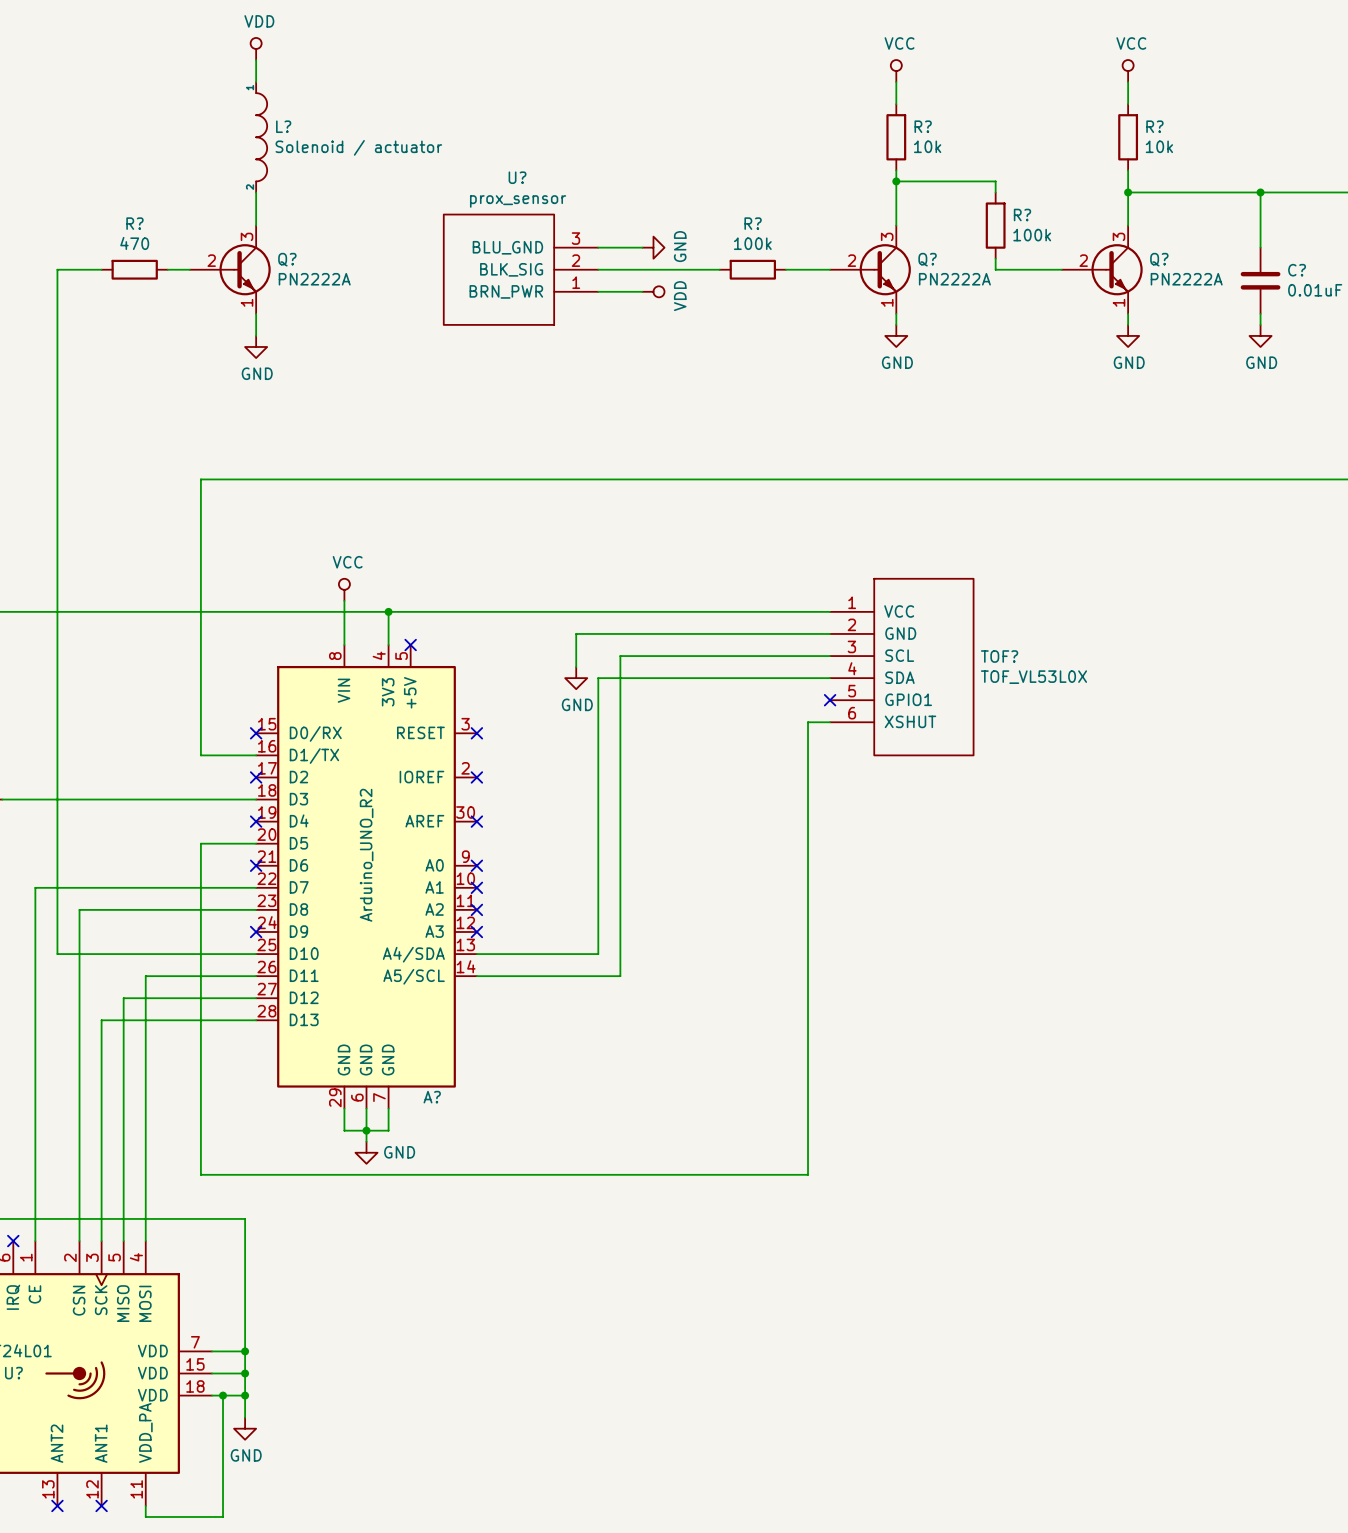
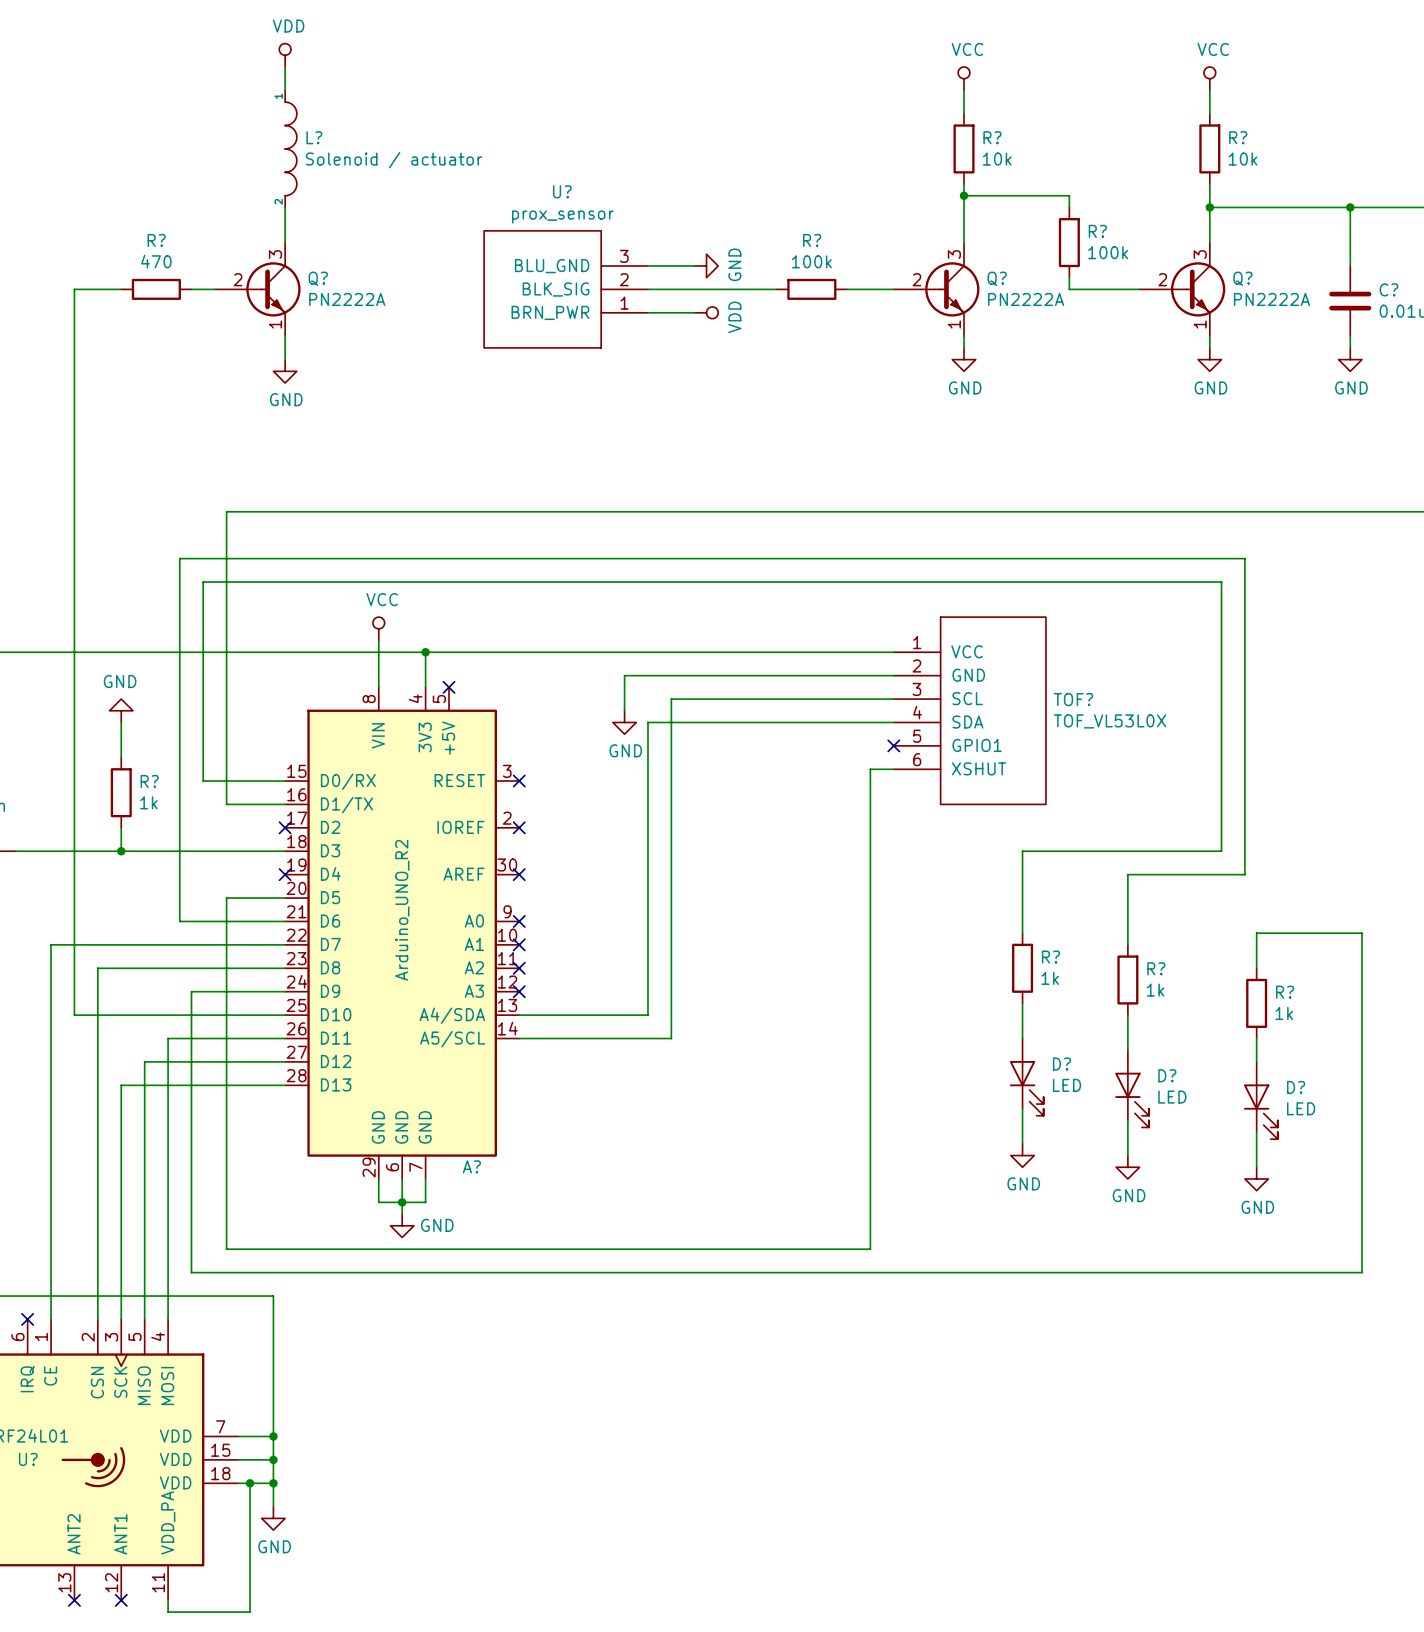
power symbol: none -> GND (121, 710)
wire: none -> (121, 722) (121, 757)
wire: none -> (285, 781) (203, 781) (203, 582) (1221, 582) (1221, 851) (1022, 851) (1022, 933)
no-connect mark: (256, 733) -> none
R?: none -> 1k (121, 792)
wire: none -> (121, 827) (121, 851)
junction: none -> (121, 851)
wire: none -> (285, 921) (179, 921) (179, 558) (1244, 558) (1244, 874) (1127, 874) (1127, 944)
no-connect mark: (256, 865) -> none
R?: none -> 1k (1022, 968)
wire: none -> (1256, 968) (1256, 933) (1361, 933) (1361, 1272) (191, 1272) (191, 991) (285, 991)
R?: none -> 1k (1127, 979)
no-connect mark: (256, 931) -> none
wire: none -> (1022, 1003) (1022, 1038)
R?: none -> 1k (1256, 1003)
wire: none -> (1127, 1015) (1127, 1050)
wire: none -> (1256, 1038) (1256, 1061)
D?: none -> LED (1026, 1077)
D?: none -> LED (1132, 1088)
D?: none -> LED (1260, 1100)
wire: none -> (1022, 1108) (1022, 1143)
wire: none -> (1127, 1120) (1127, 1155)
wire: none -> (1256, 1132) (1256, 1167)
power symbol: none -> GND (1022, 1155)
power symbol: none -> GND (1127, 1167)
power symbol: none -> GND (1256, 1178)

